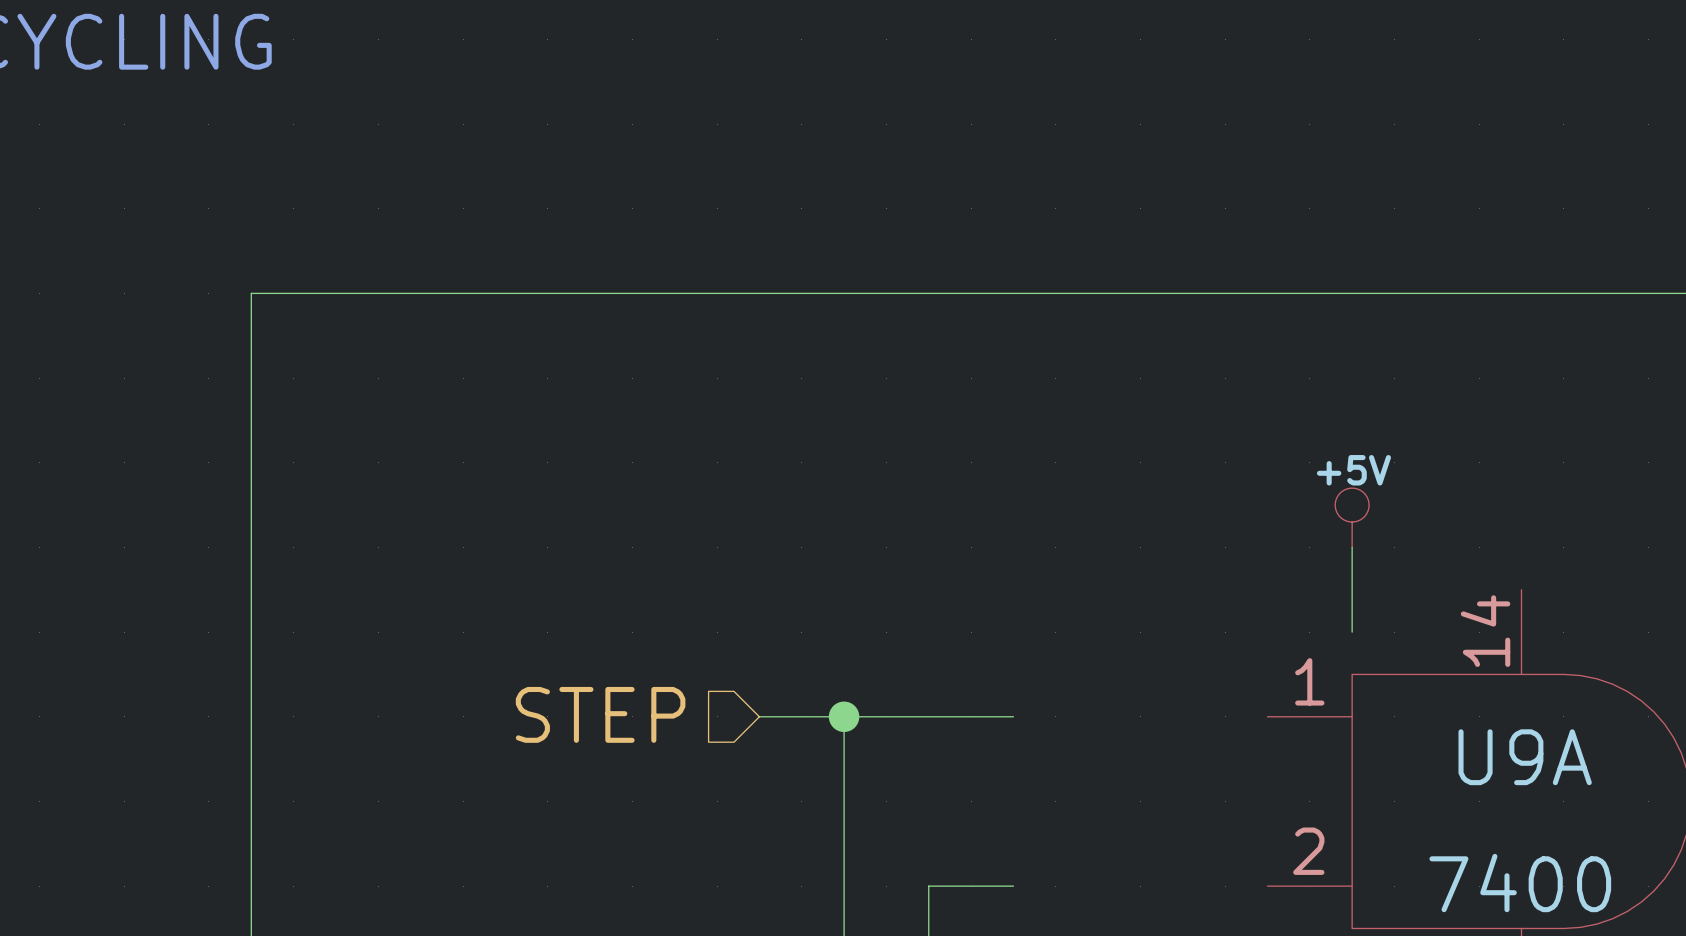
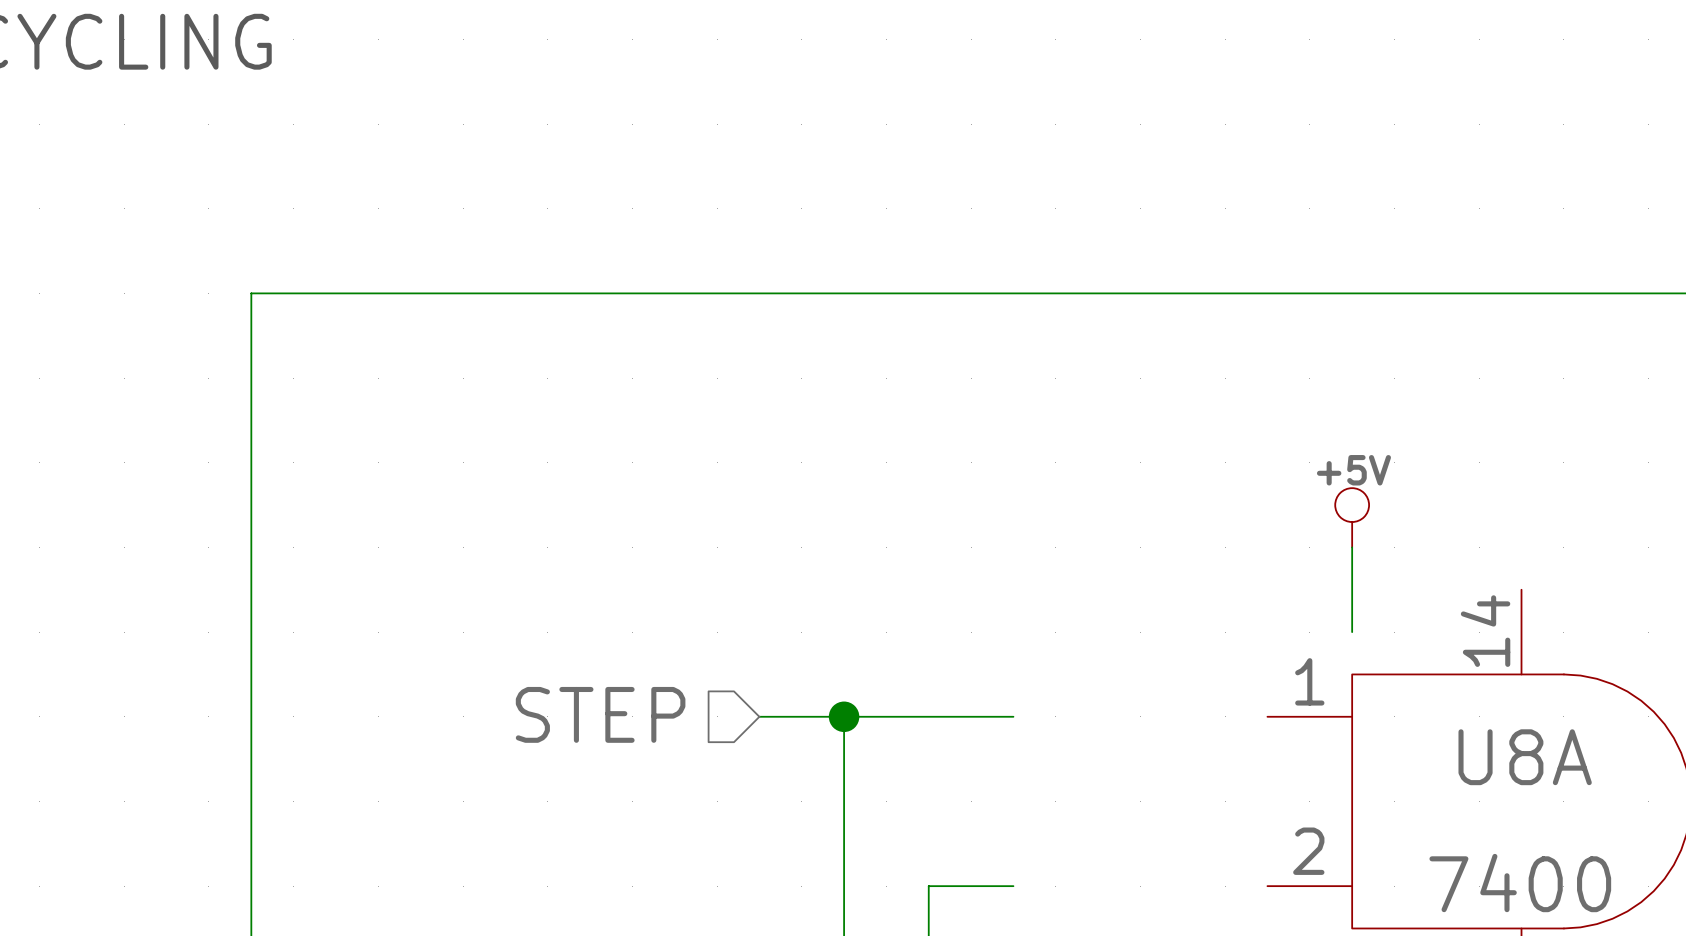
U9A name: U9A (1525, 757) -> U8A (1525, 757)

